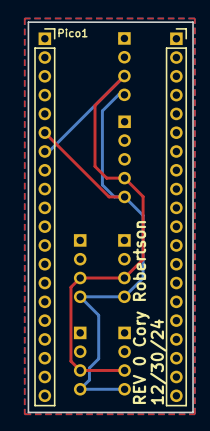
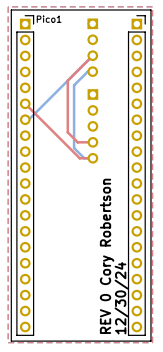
top track: (124, 178) (143, 196) (143, 259) (124, 278) (80, 278) (70, 287) (70, 361) (80, 370) (124, 370) -> none
bottom track: (124, 196) (143, 215) (143, 278) (124, 296) (80, 296) (98, 315) (98, 358) (89, 368) (89, 380) (80, 389) (124, 389) -> none
part: (80, 268) -> none
part: (124, 268) -> none
part: (80, 361) -> none
part: (124, 361) -> none

